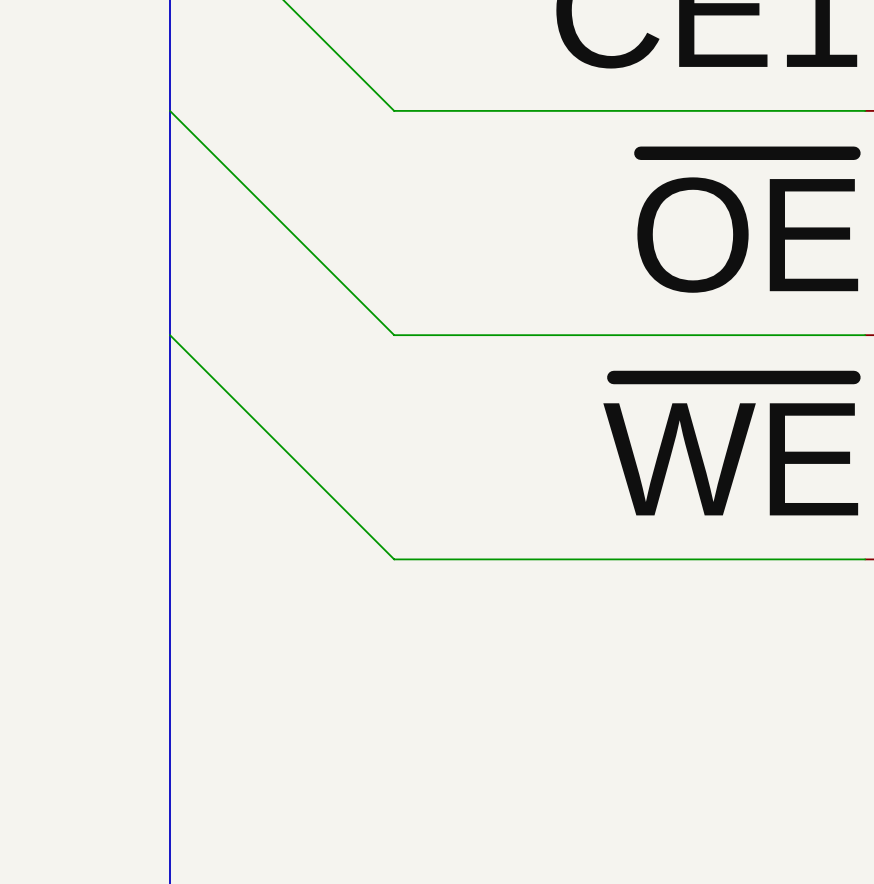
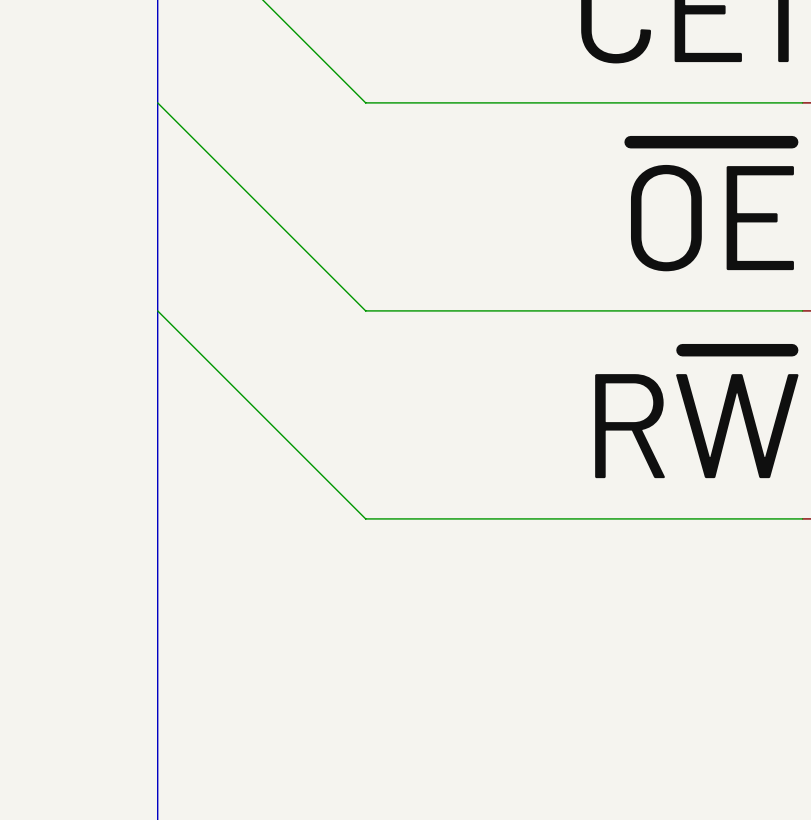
label: ~{WE} (730, 446) -> R~{W} (696, 414)

